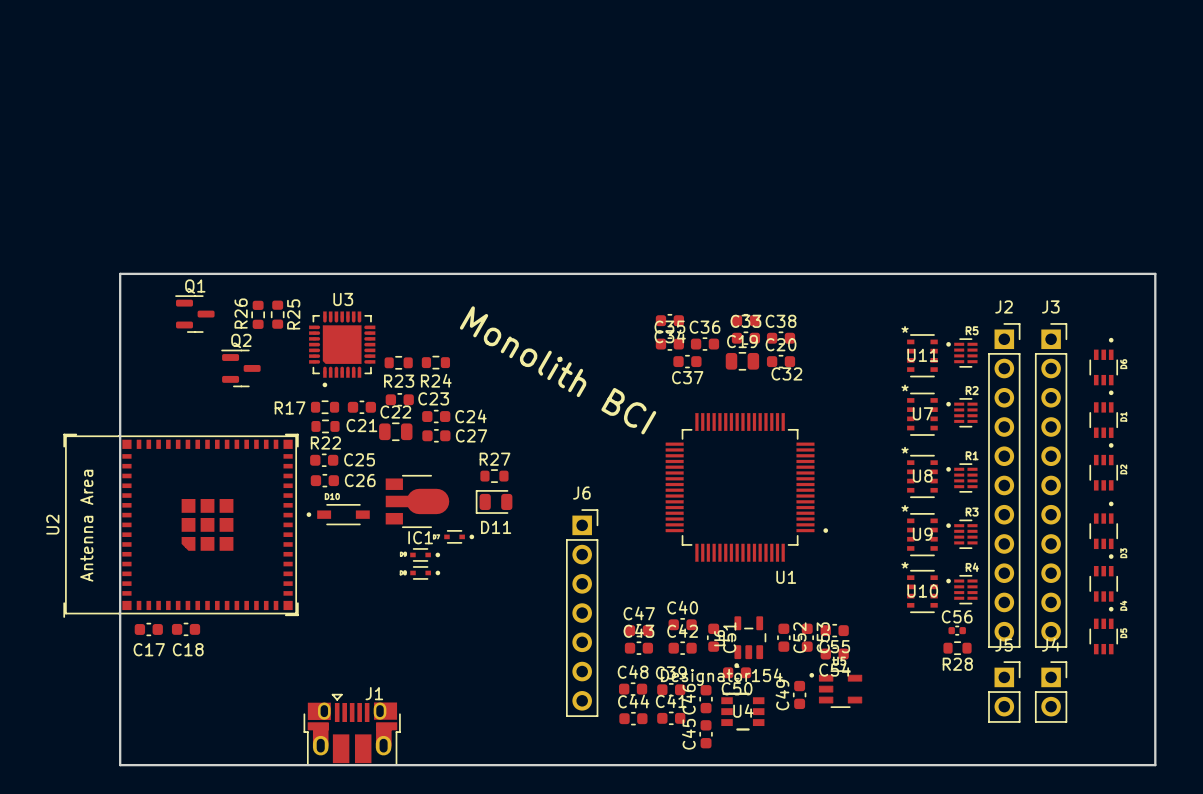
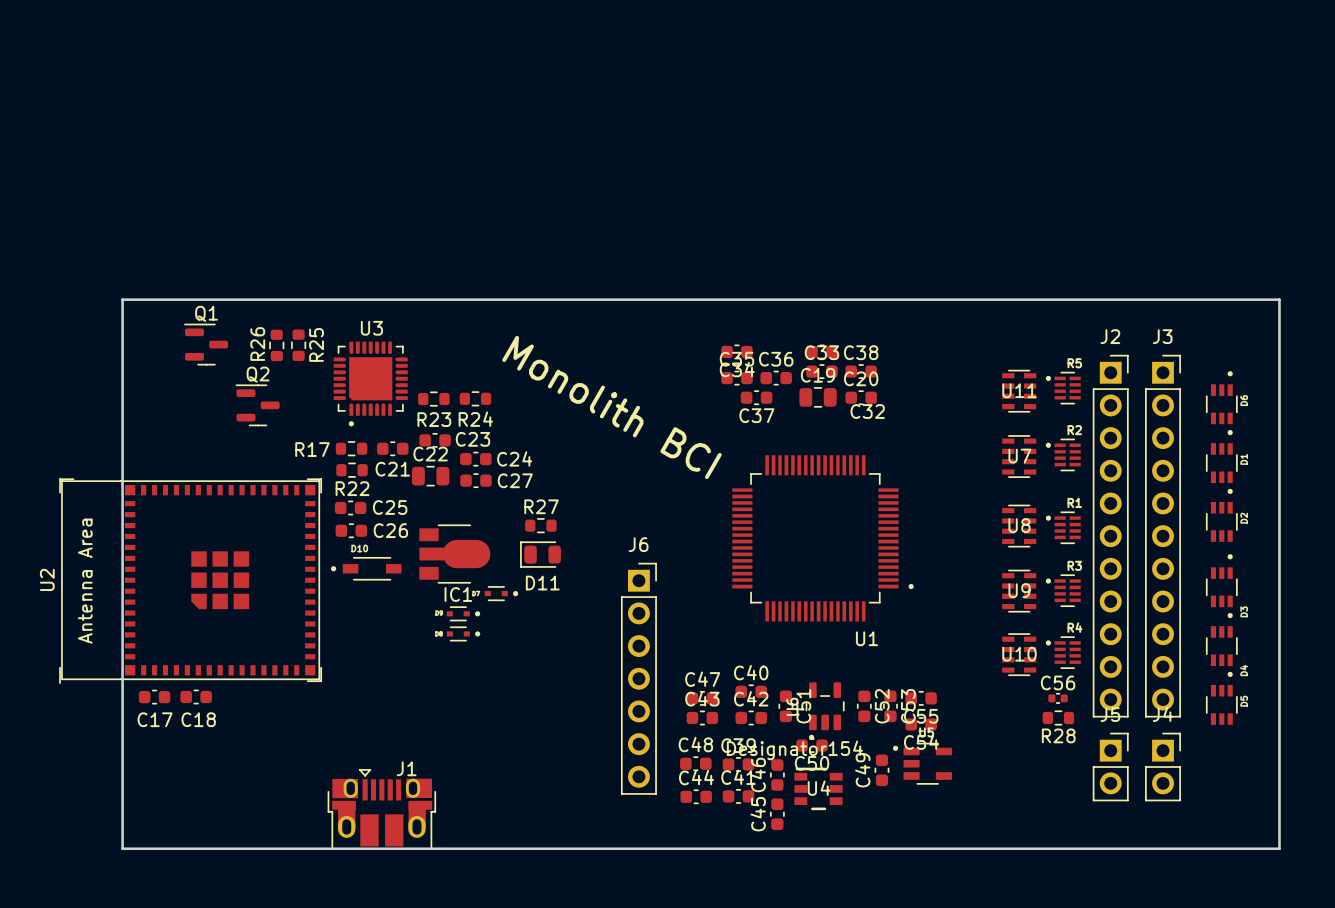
U11 footprint: [907, 334, 938, 378] -> [1002, 369, 1037, 413]
U7 footprint: [907, 392, 938, 436] -> [1002, 435, 1037, 478]
U8 footprint: [907, 454, 938, 499] -> [1002, 504, 1037, 548]
U9 footprint: [907, 513, 938, 557] -> [1002, 569, 1037, 613]
U10 footprint: [907, 569, 938, 614] -> [1002, 633, 1037, 676]

